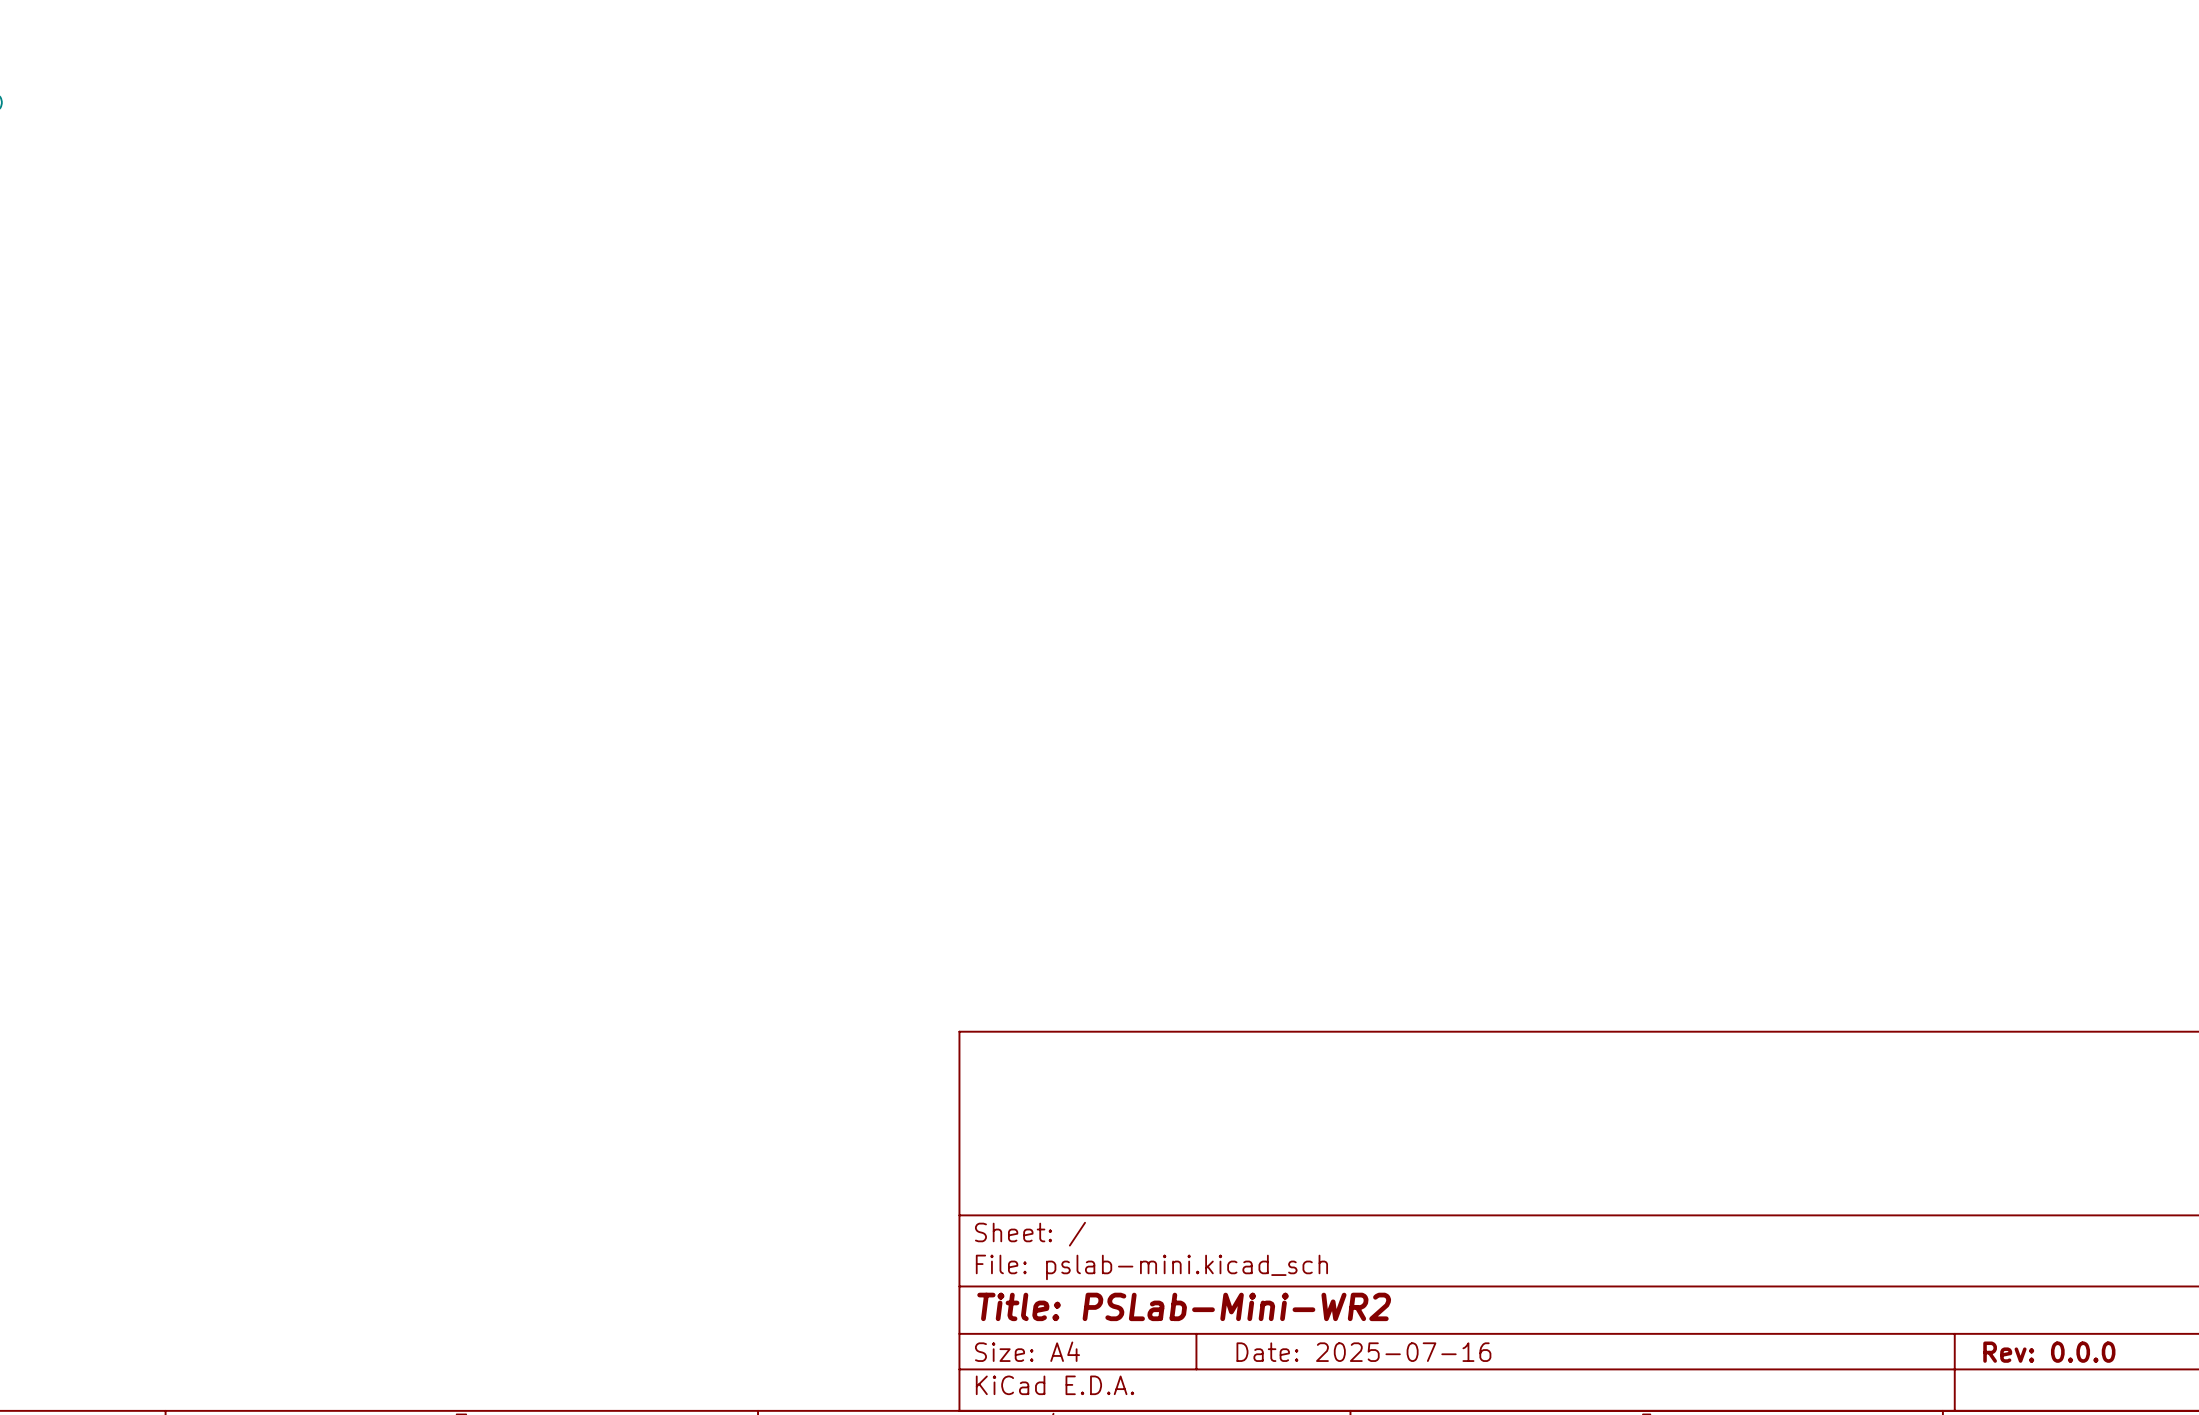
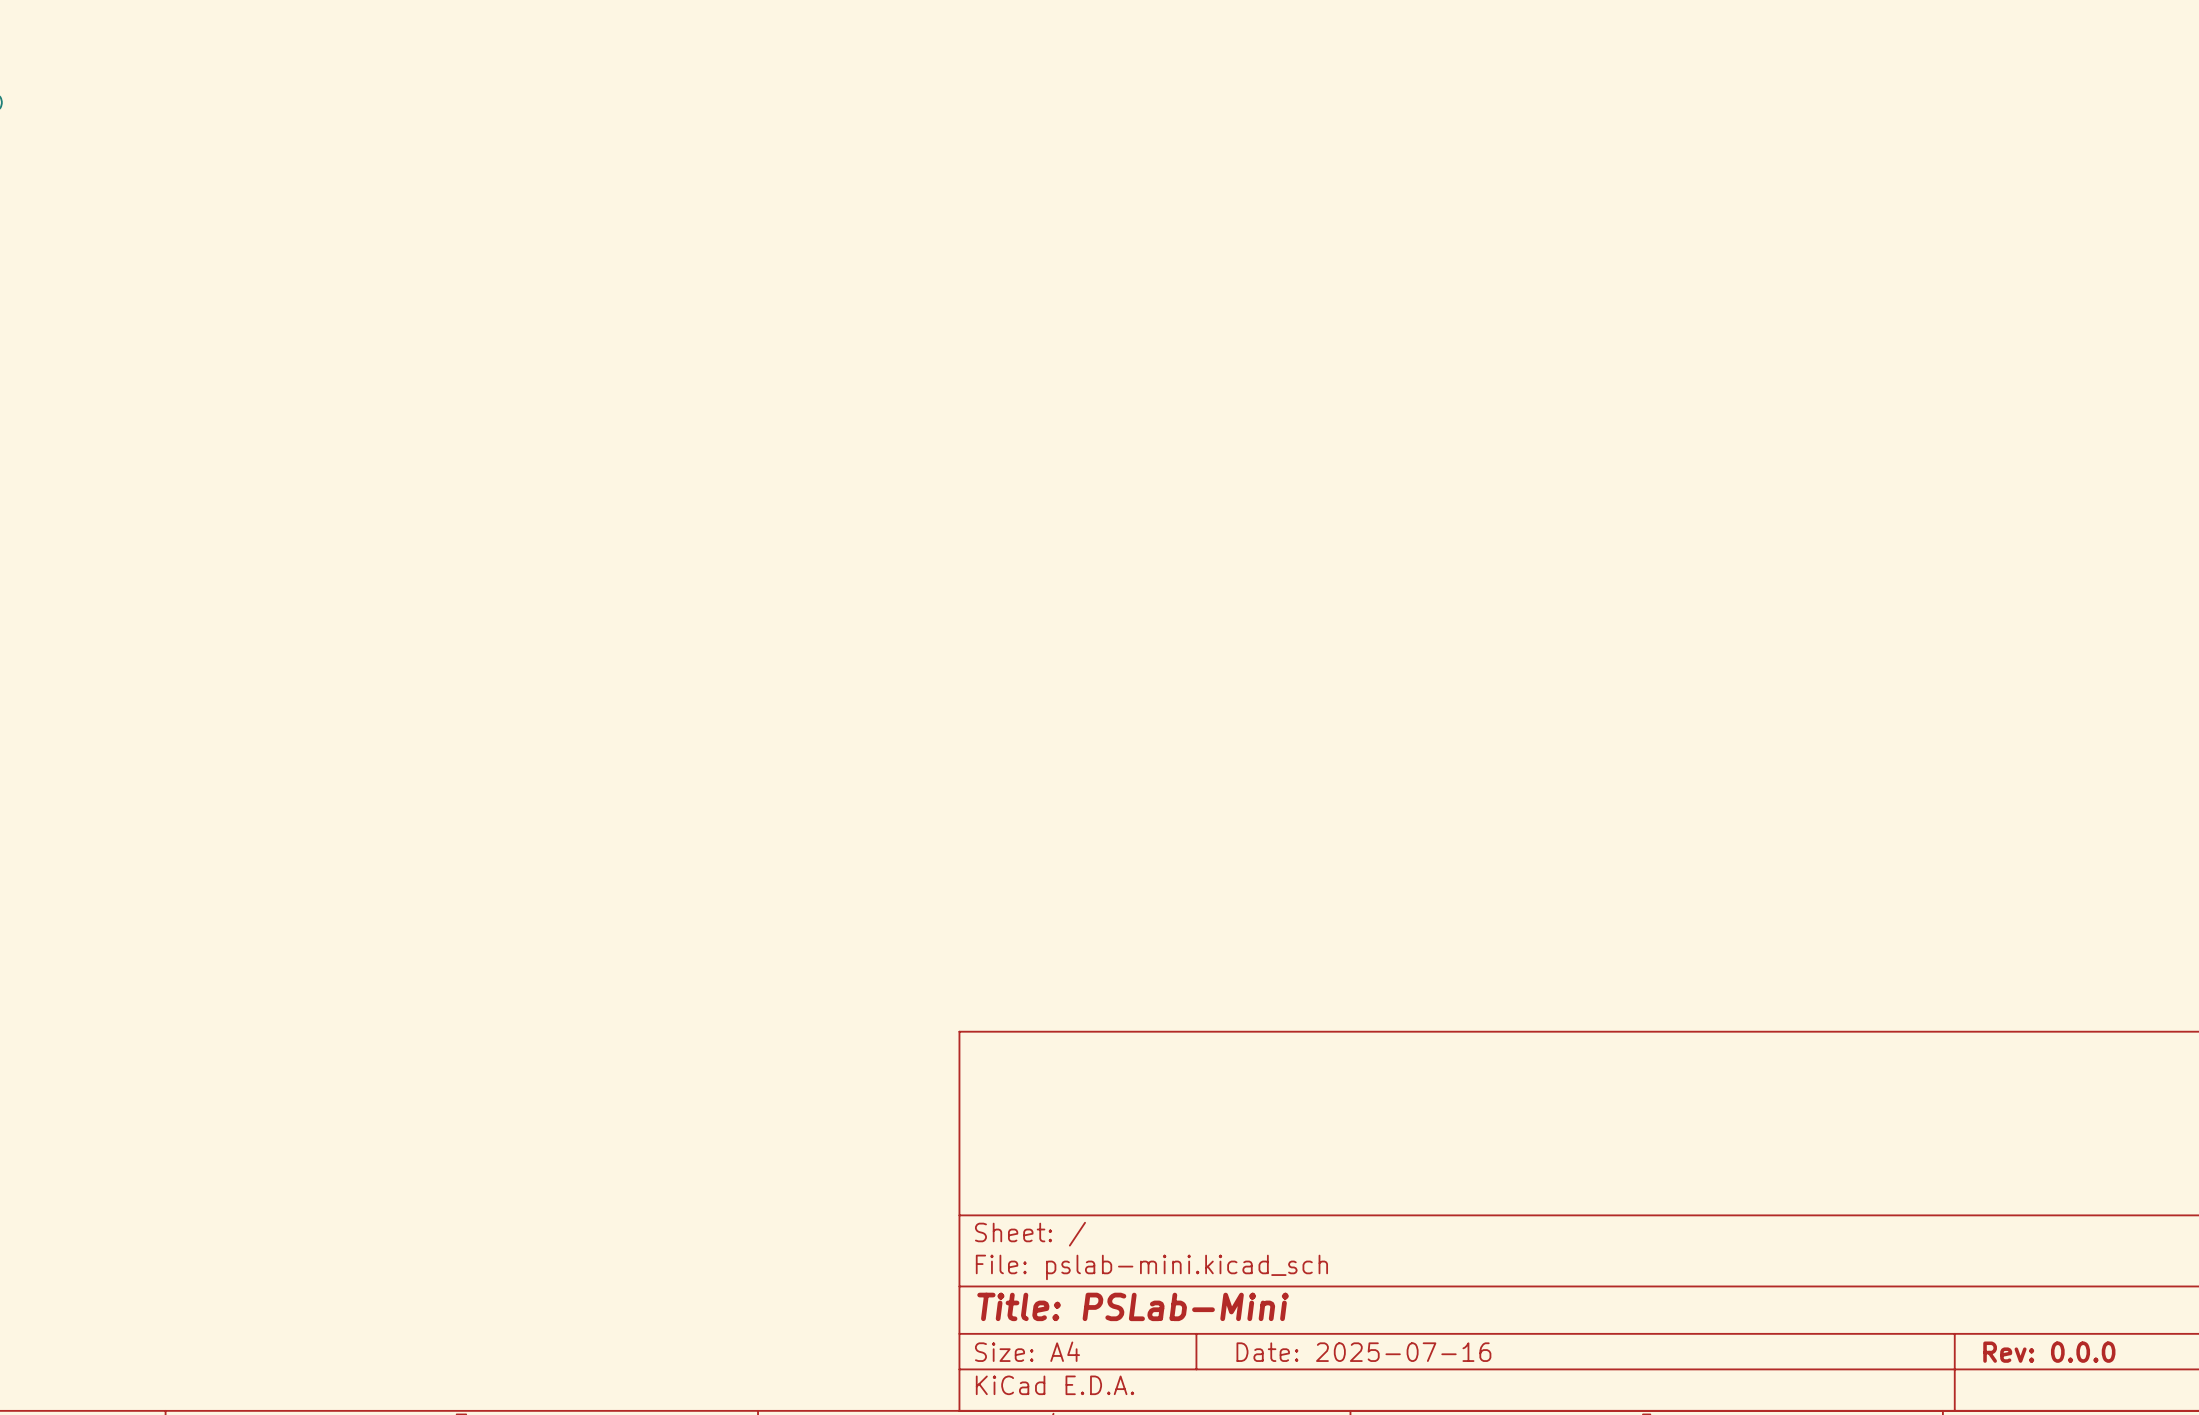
title block: Title: PSLab-Mini-WR2 (1184, 1306) -> Title: PSLab-Mini (1133, 1306)

